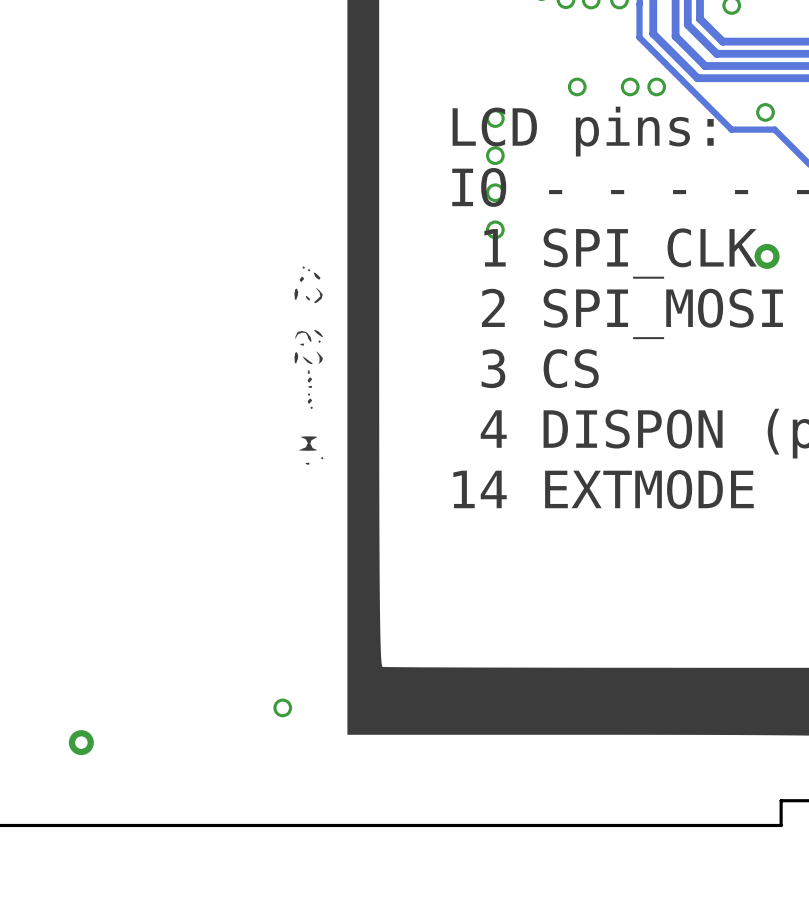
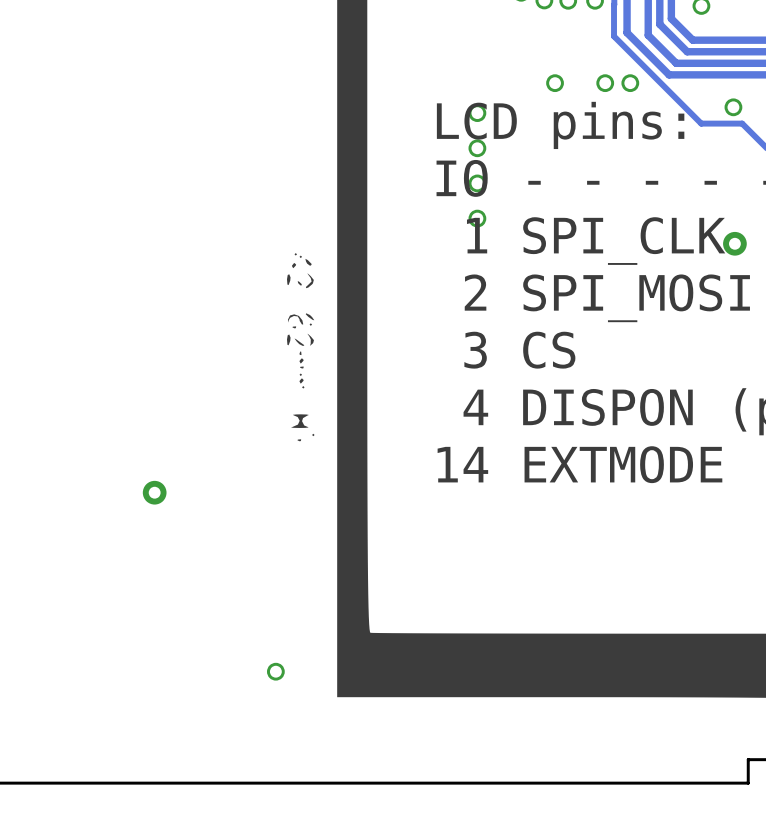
via: none -> (154, 492)
via: (81, 742) -> none

